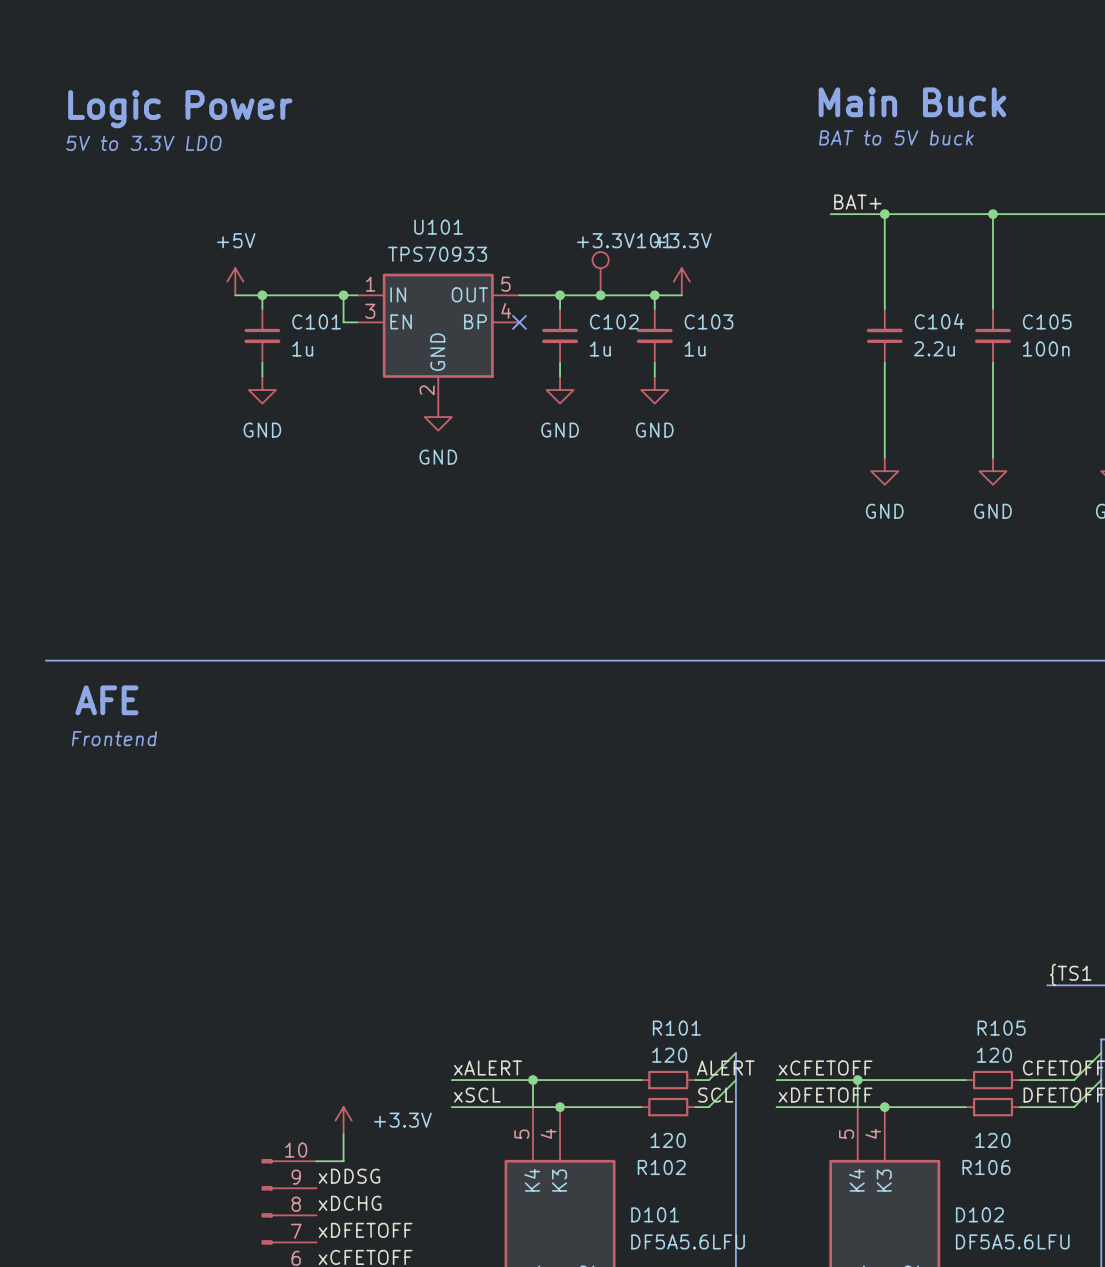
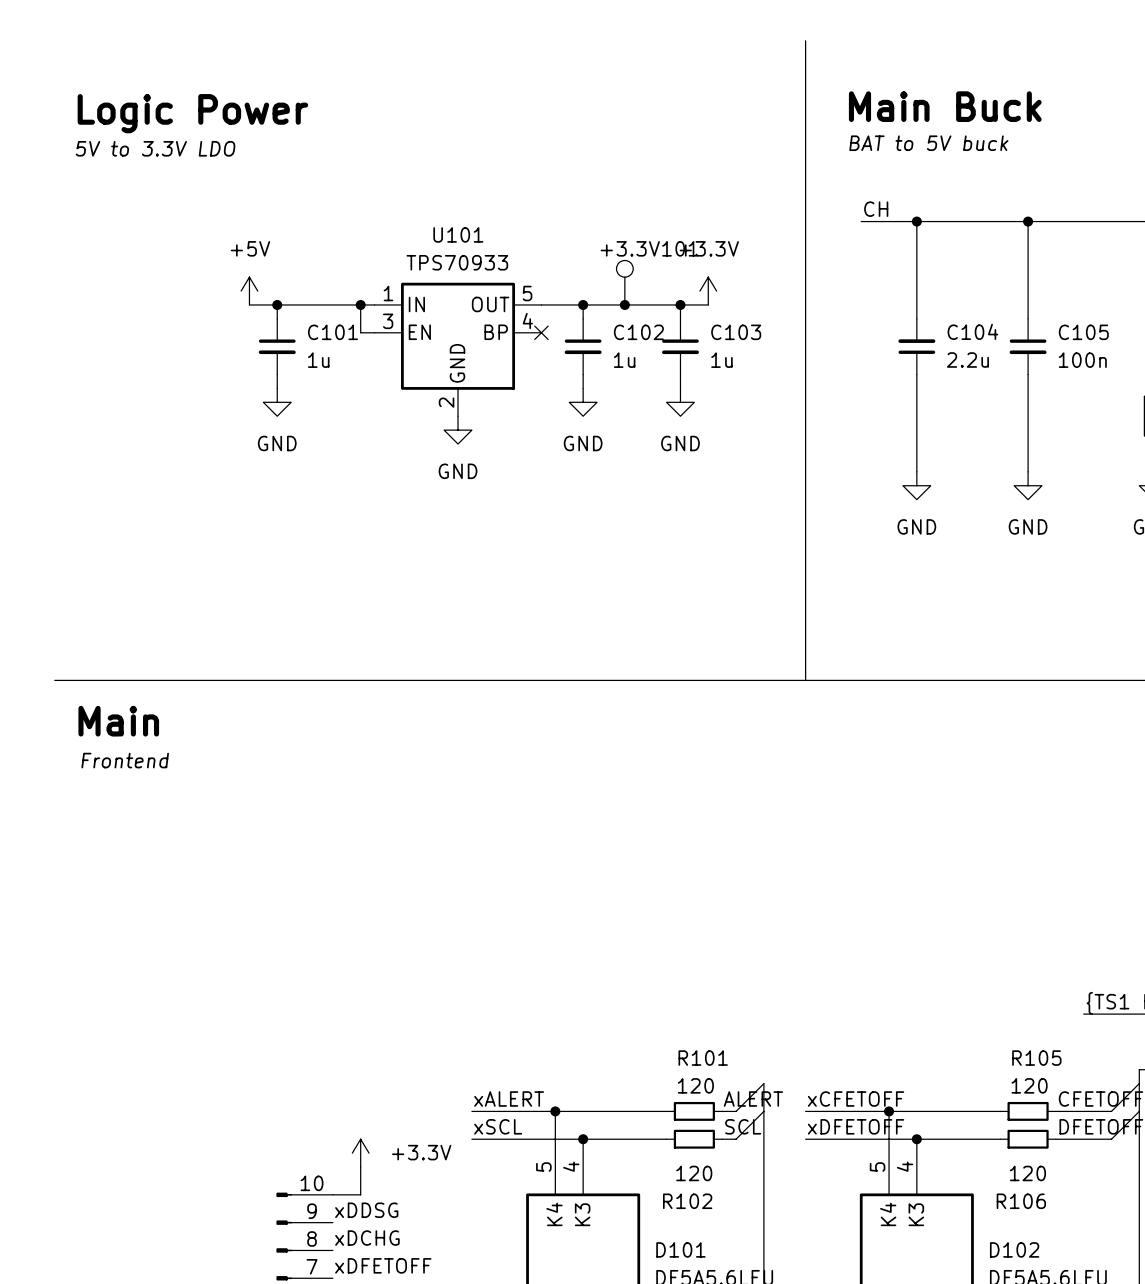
line: none -> (805, 40) (805, 680)
label: BAT+ (857, 202) -> CH (876, 209)
text: AFE (106, 700) -> Main (118, 721)

